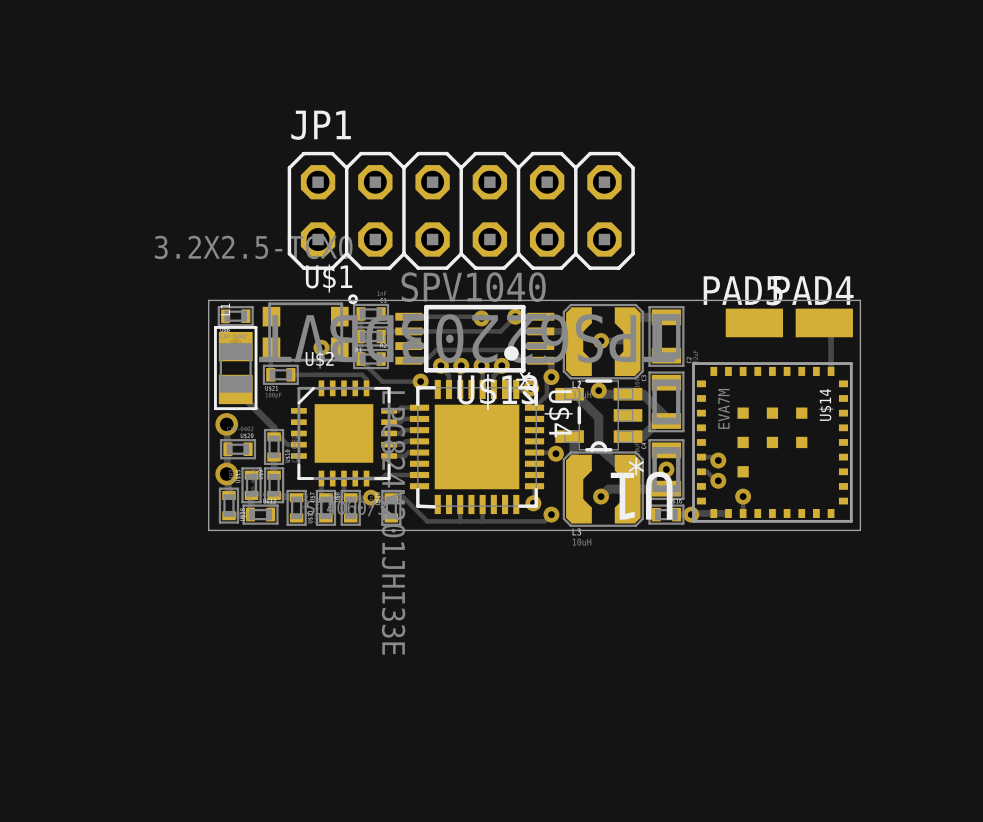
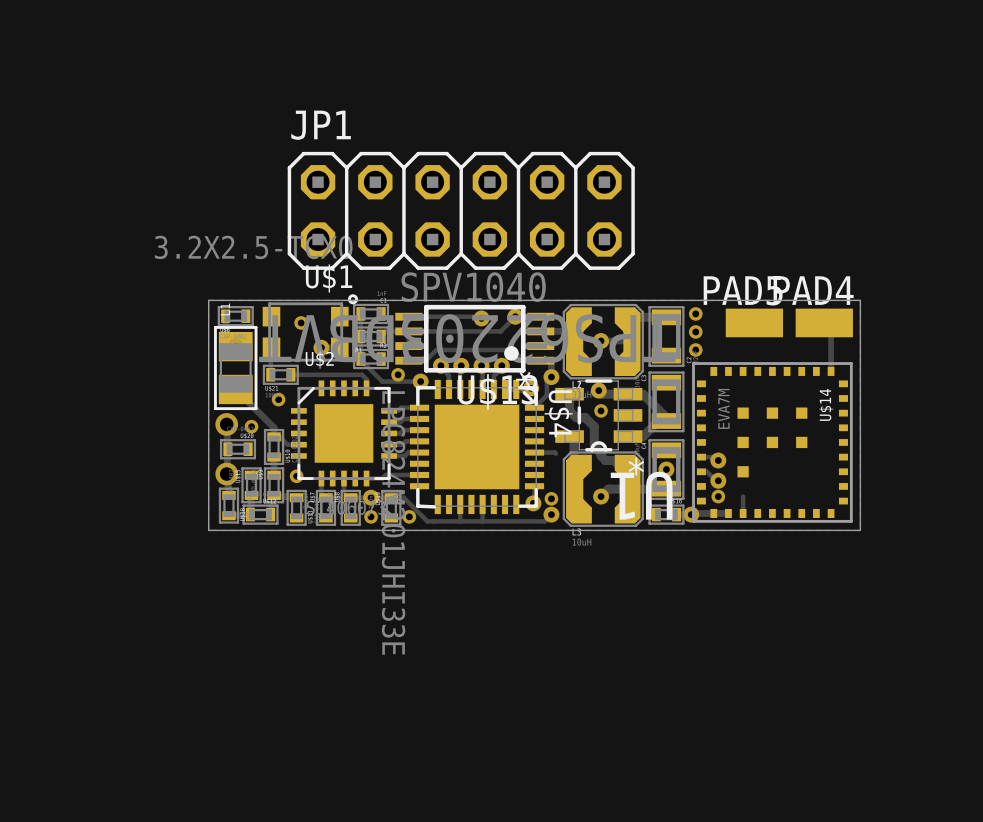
via: none -> (695, 313)
via: none -> (301, 322)
via: none -> (695, 331)
via: none -> (695, 350)
via: none -> (398, 374)
track: (575, 394) (598, 417) (598, 447) (619, 465) -> (569, 394) (569, 410) (576, 417) (585, 417) (594, 426) (594, 444) (601, 455) (605, 460) (614, 460) (619, 465)
via: none -> (278, 399)
via: none -> (601, 410)
via: none -> (251, 426)
via: (555, 453) -> none
via: none -> (296, 476)
via: none -> (718, 496)
via: (743, 496) -> none
via: none -> (551, 498)
via: none -> (371, 516)
via: none -> (409, 516)

